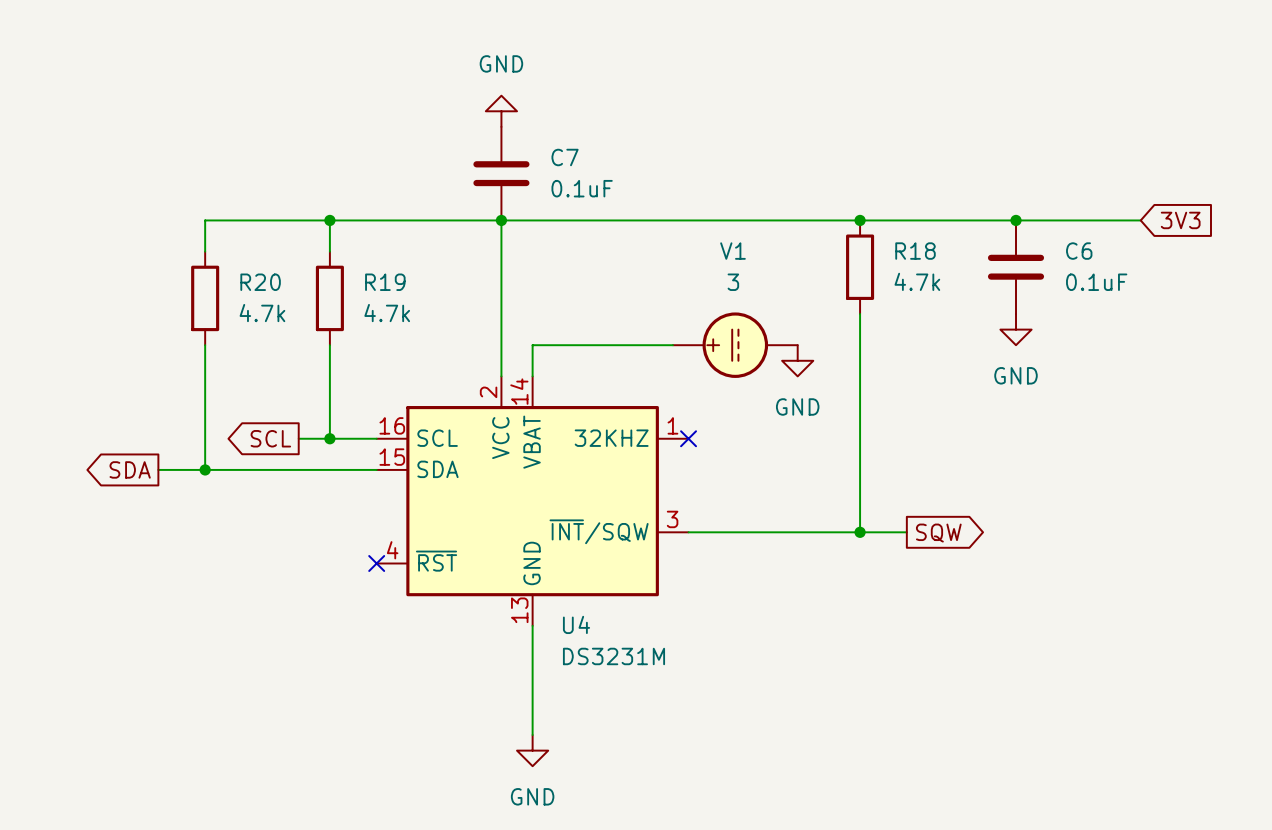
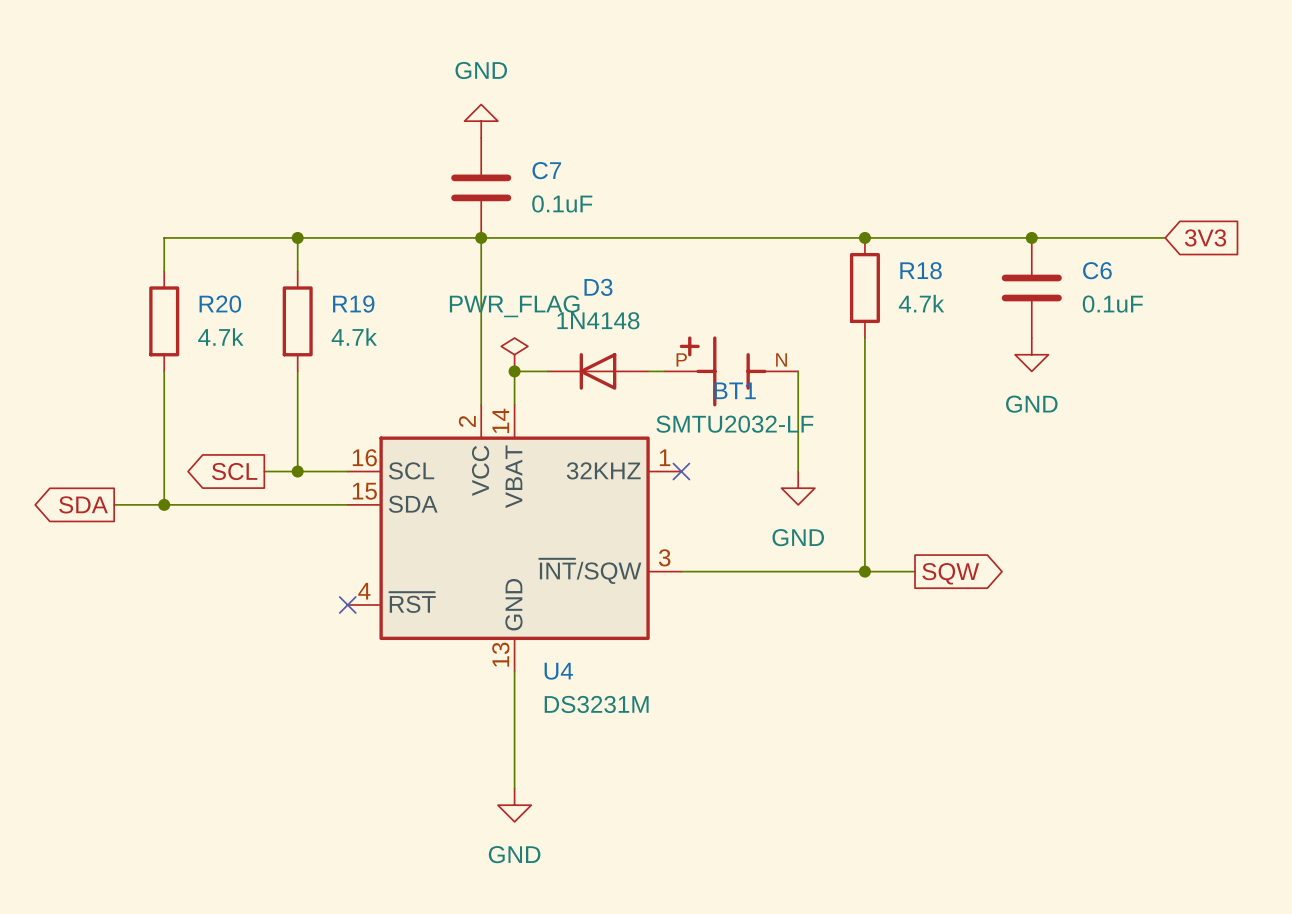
power symbol: none -> PWR_FLAG (514, 354)
junction: none -> (514, 371)
D3: none -> 1N4148 (598, 371)
V1: 3 (735, 345) -> none
BT1: none -> SMTU2032-LF (731, 371)
wire: none -> (798, 371) (798, 471)
power symbol position: GND (797, 360) -> GND (798, 488)

